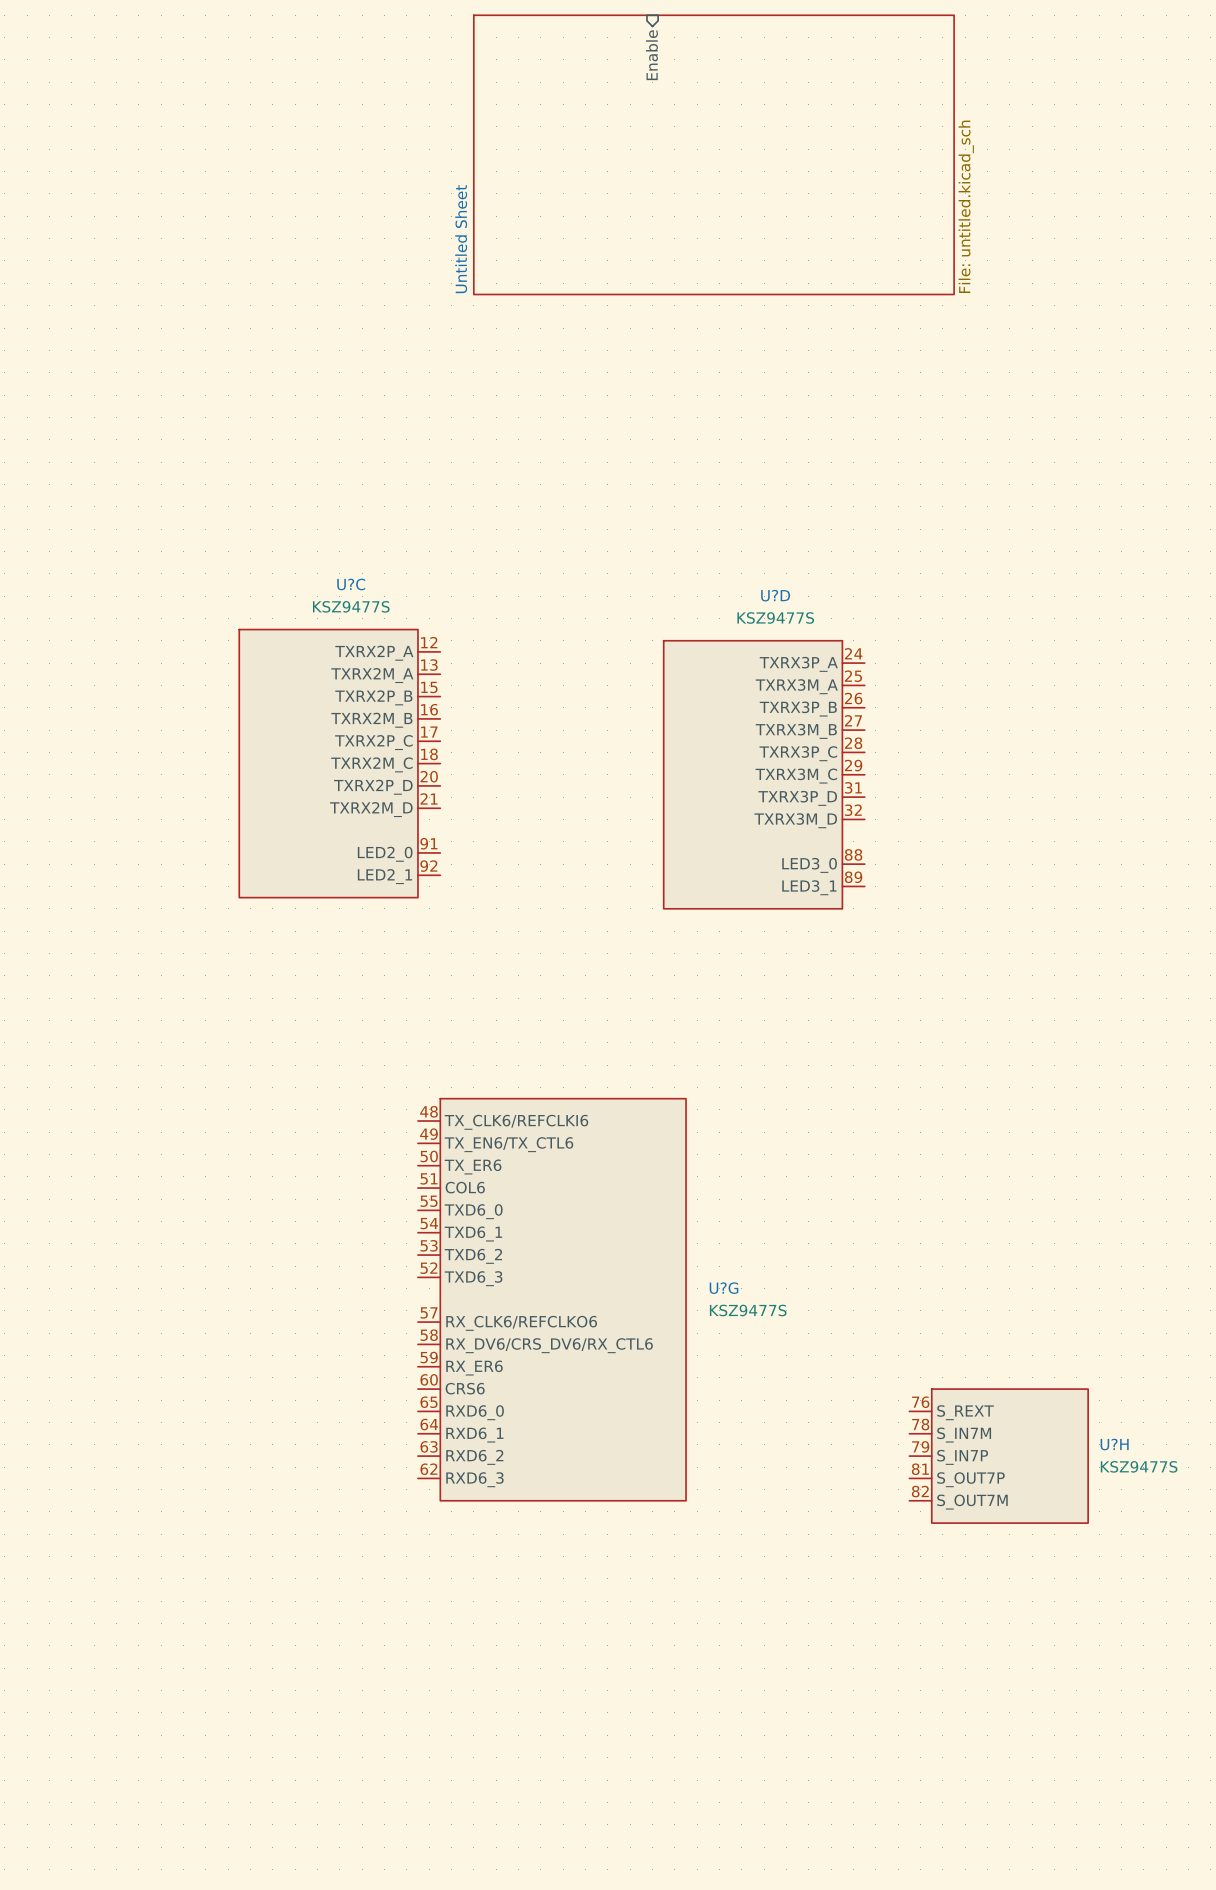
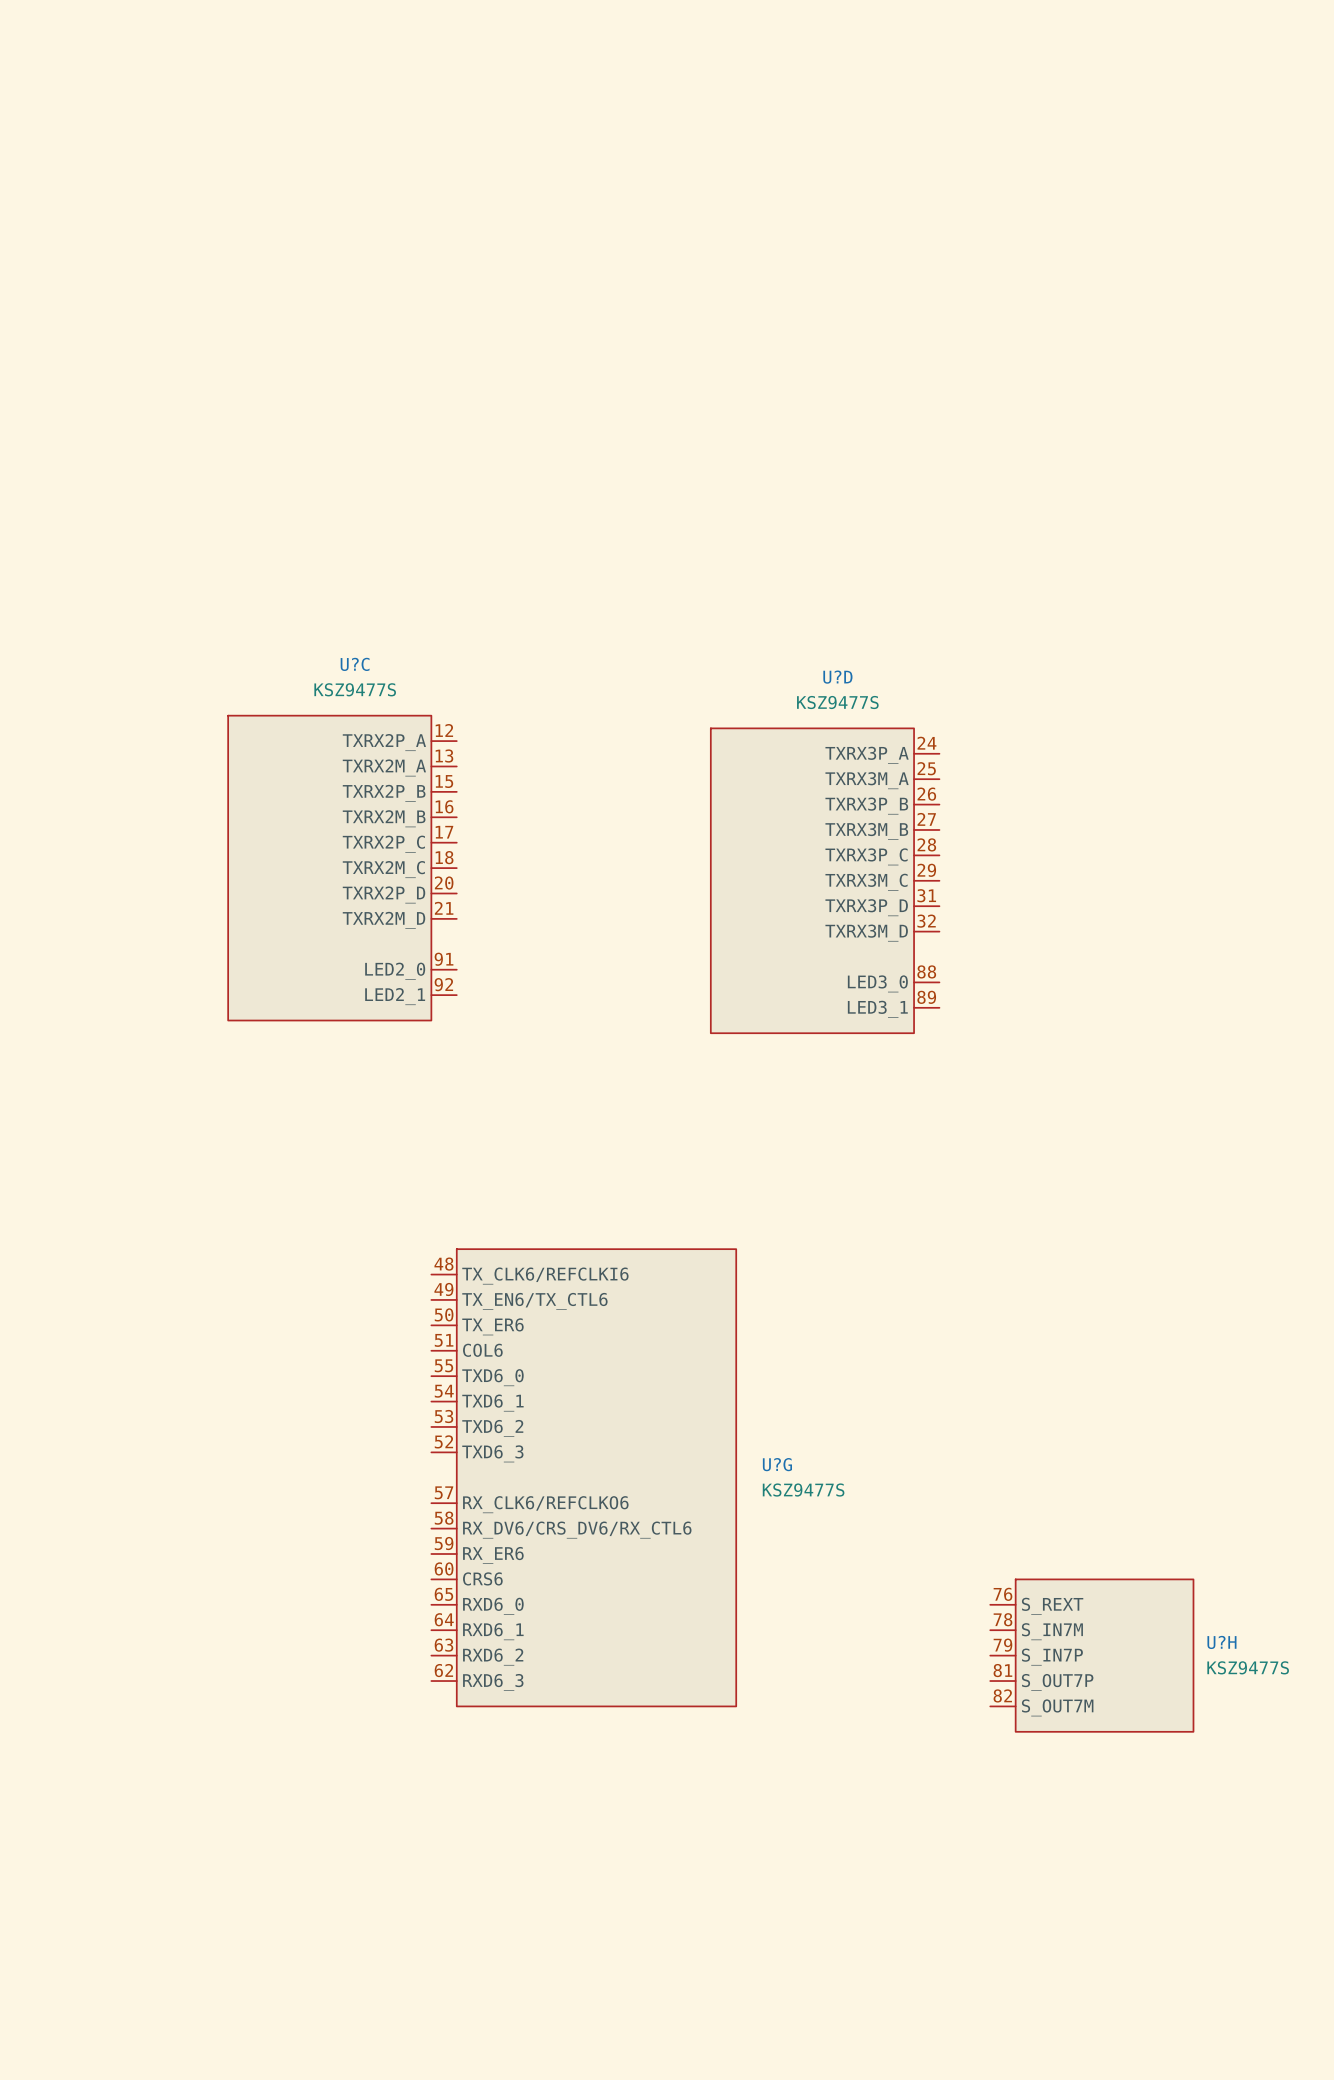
sheet pin: Enable (651, 55) -> none
sheet Untitled Sheet: File: untitled.kicad_sch (713, 154) -> none

